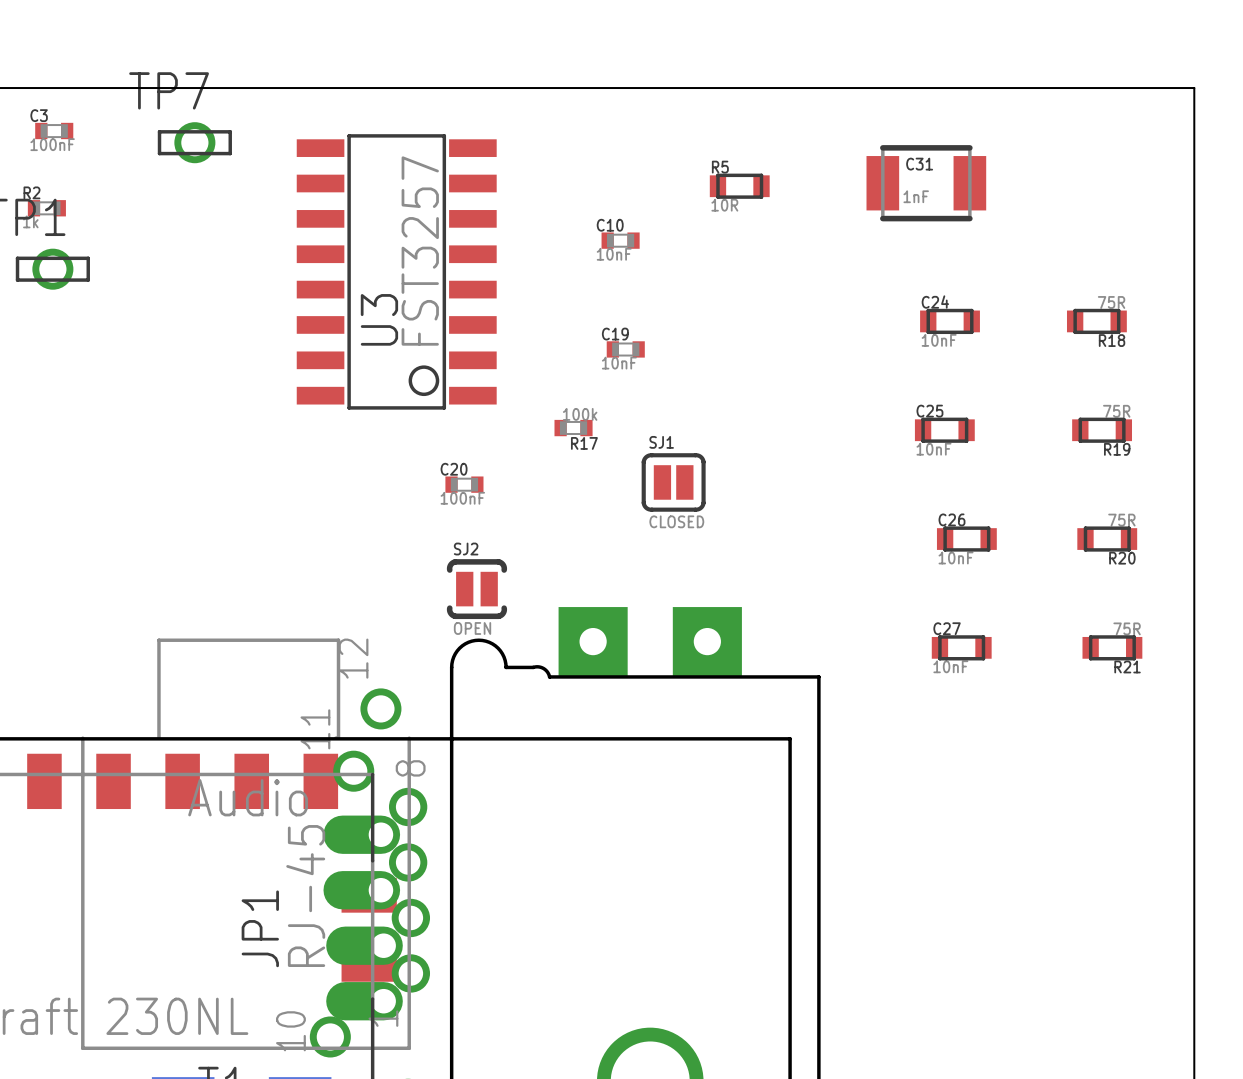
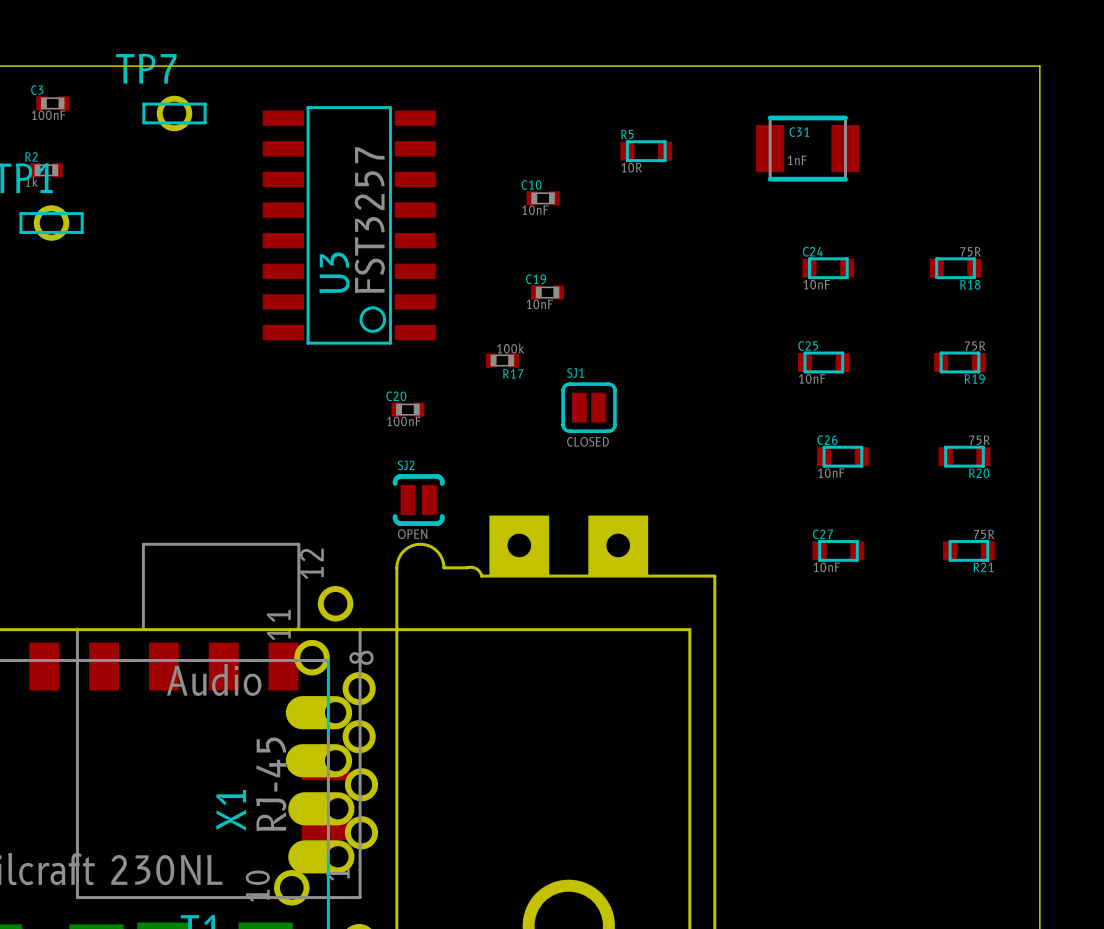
JP1 name: JP1 (260, 928) -> X1 (231, 810)

